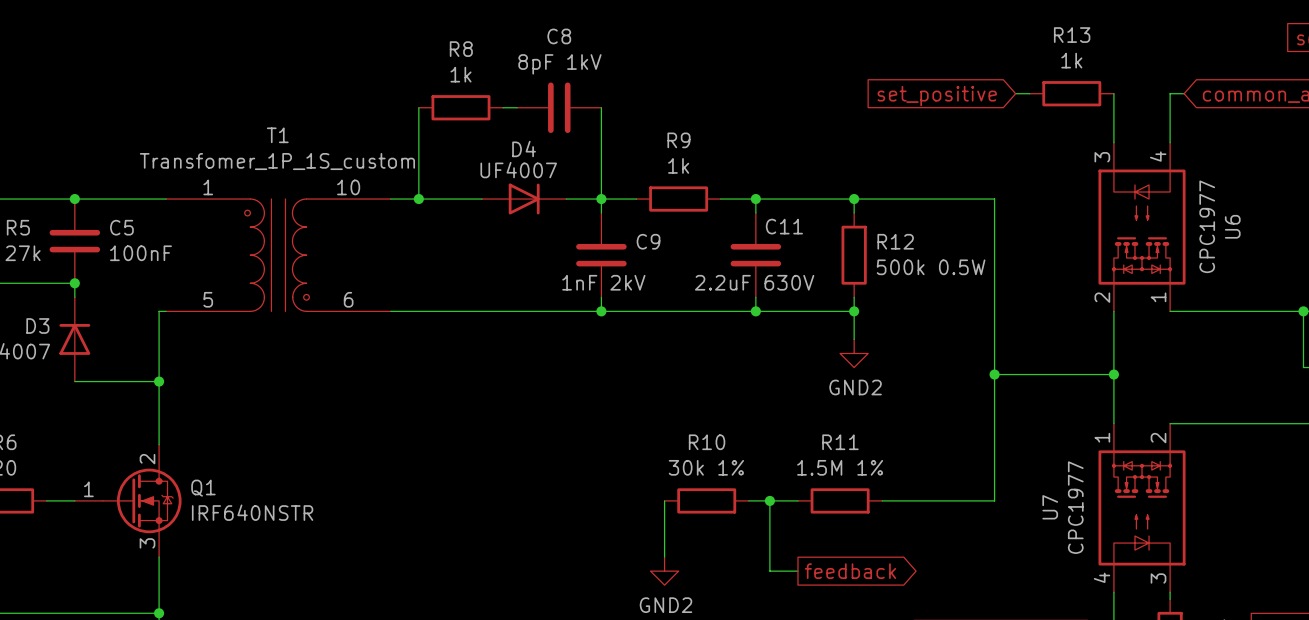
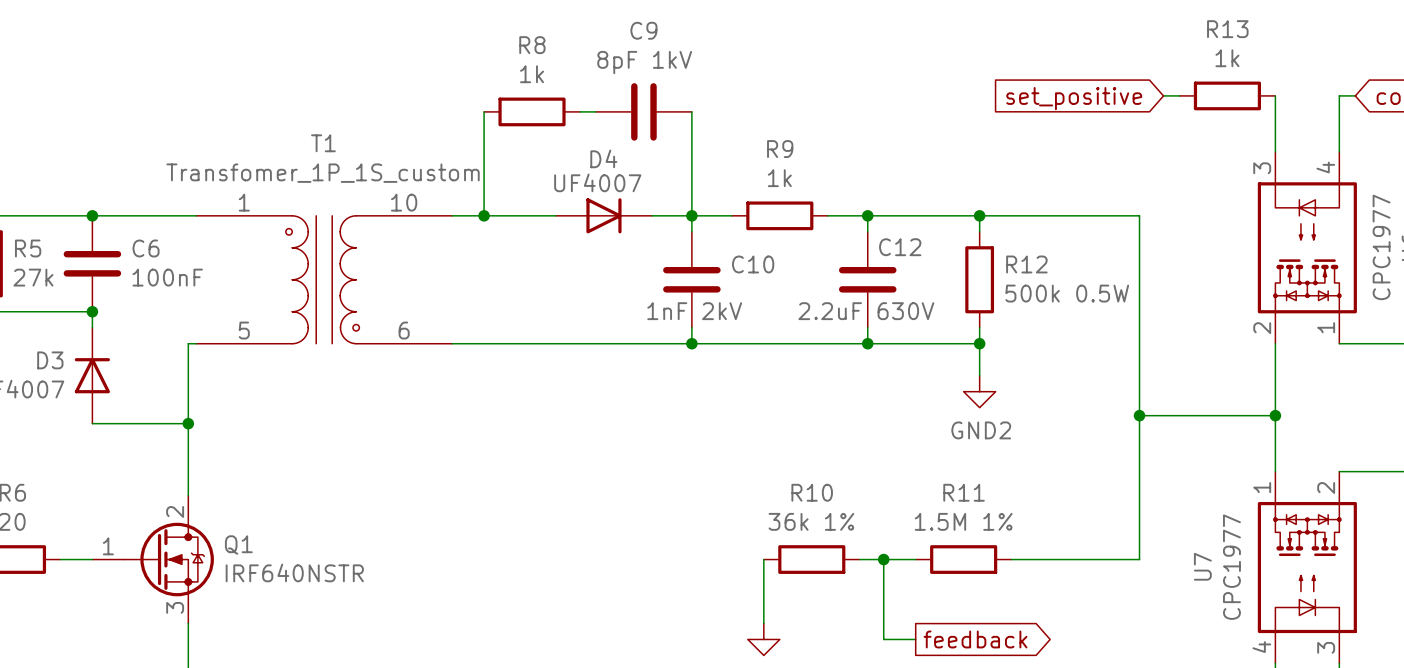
C8 name: C8 (559, 36) -> C9 (643, 30)
C11 name: C11 (784, 226) -> C12 (900, 247)
C5 name: C5 (121, 227) -> C6 (146, 248)
C9 name: C9 (648, 241) -> C10 (753, 264)
R10 value: 30k 1% (706, 467) -> 36k 1% (811, 521)

